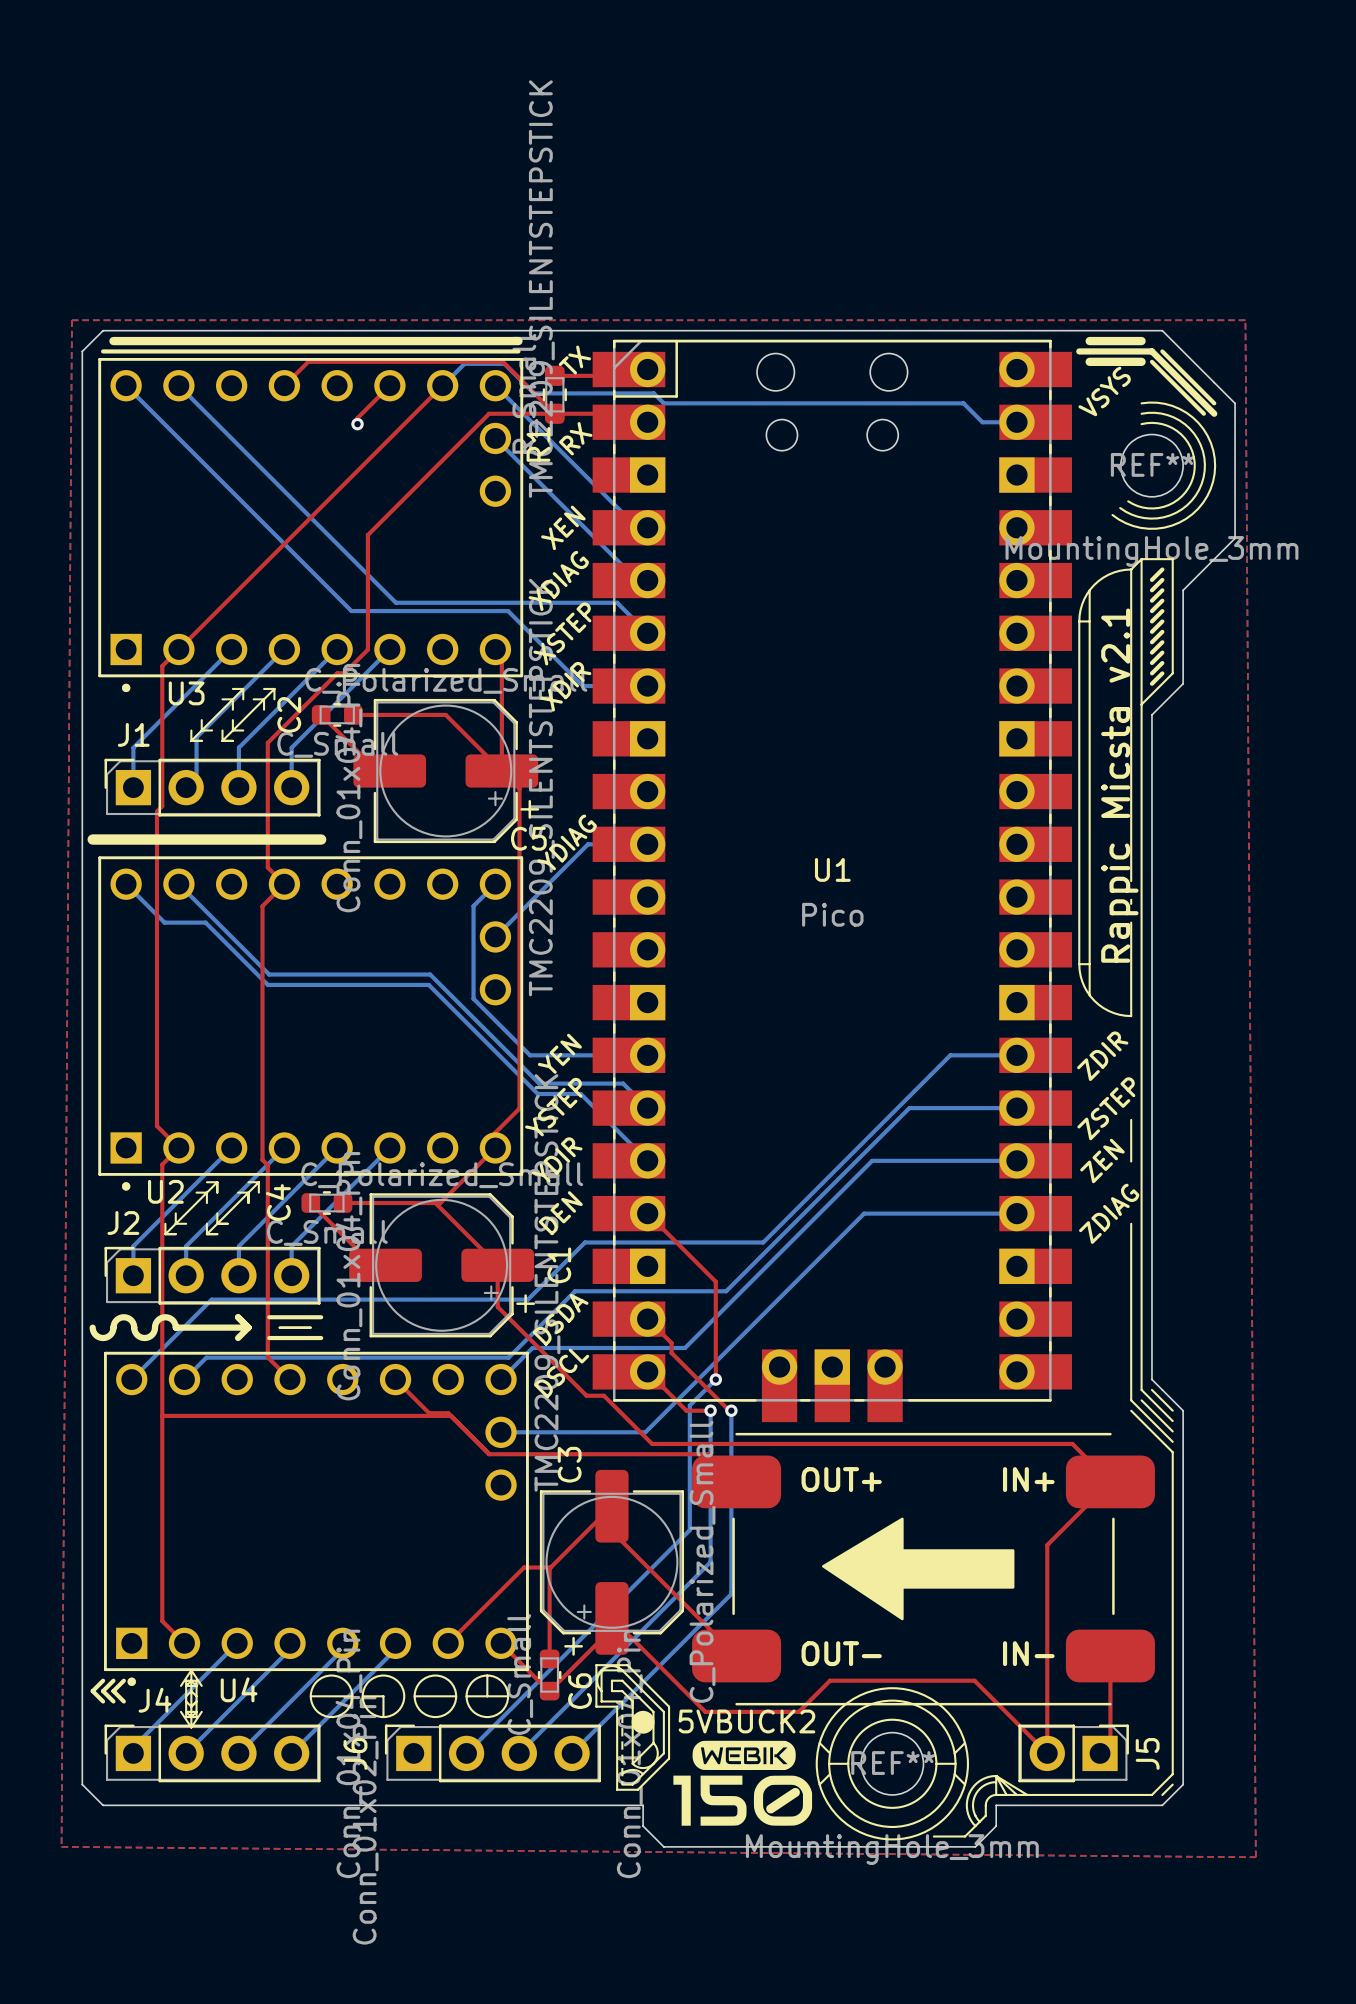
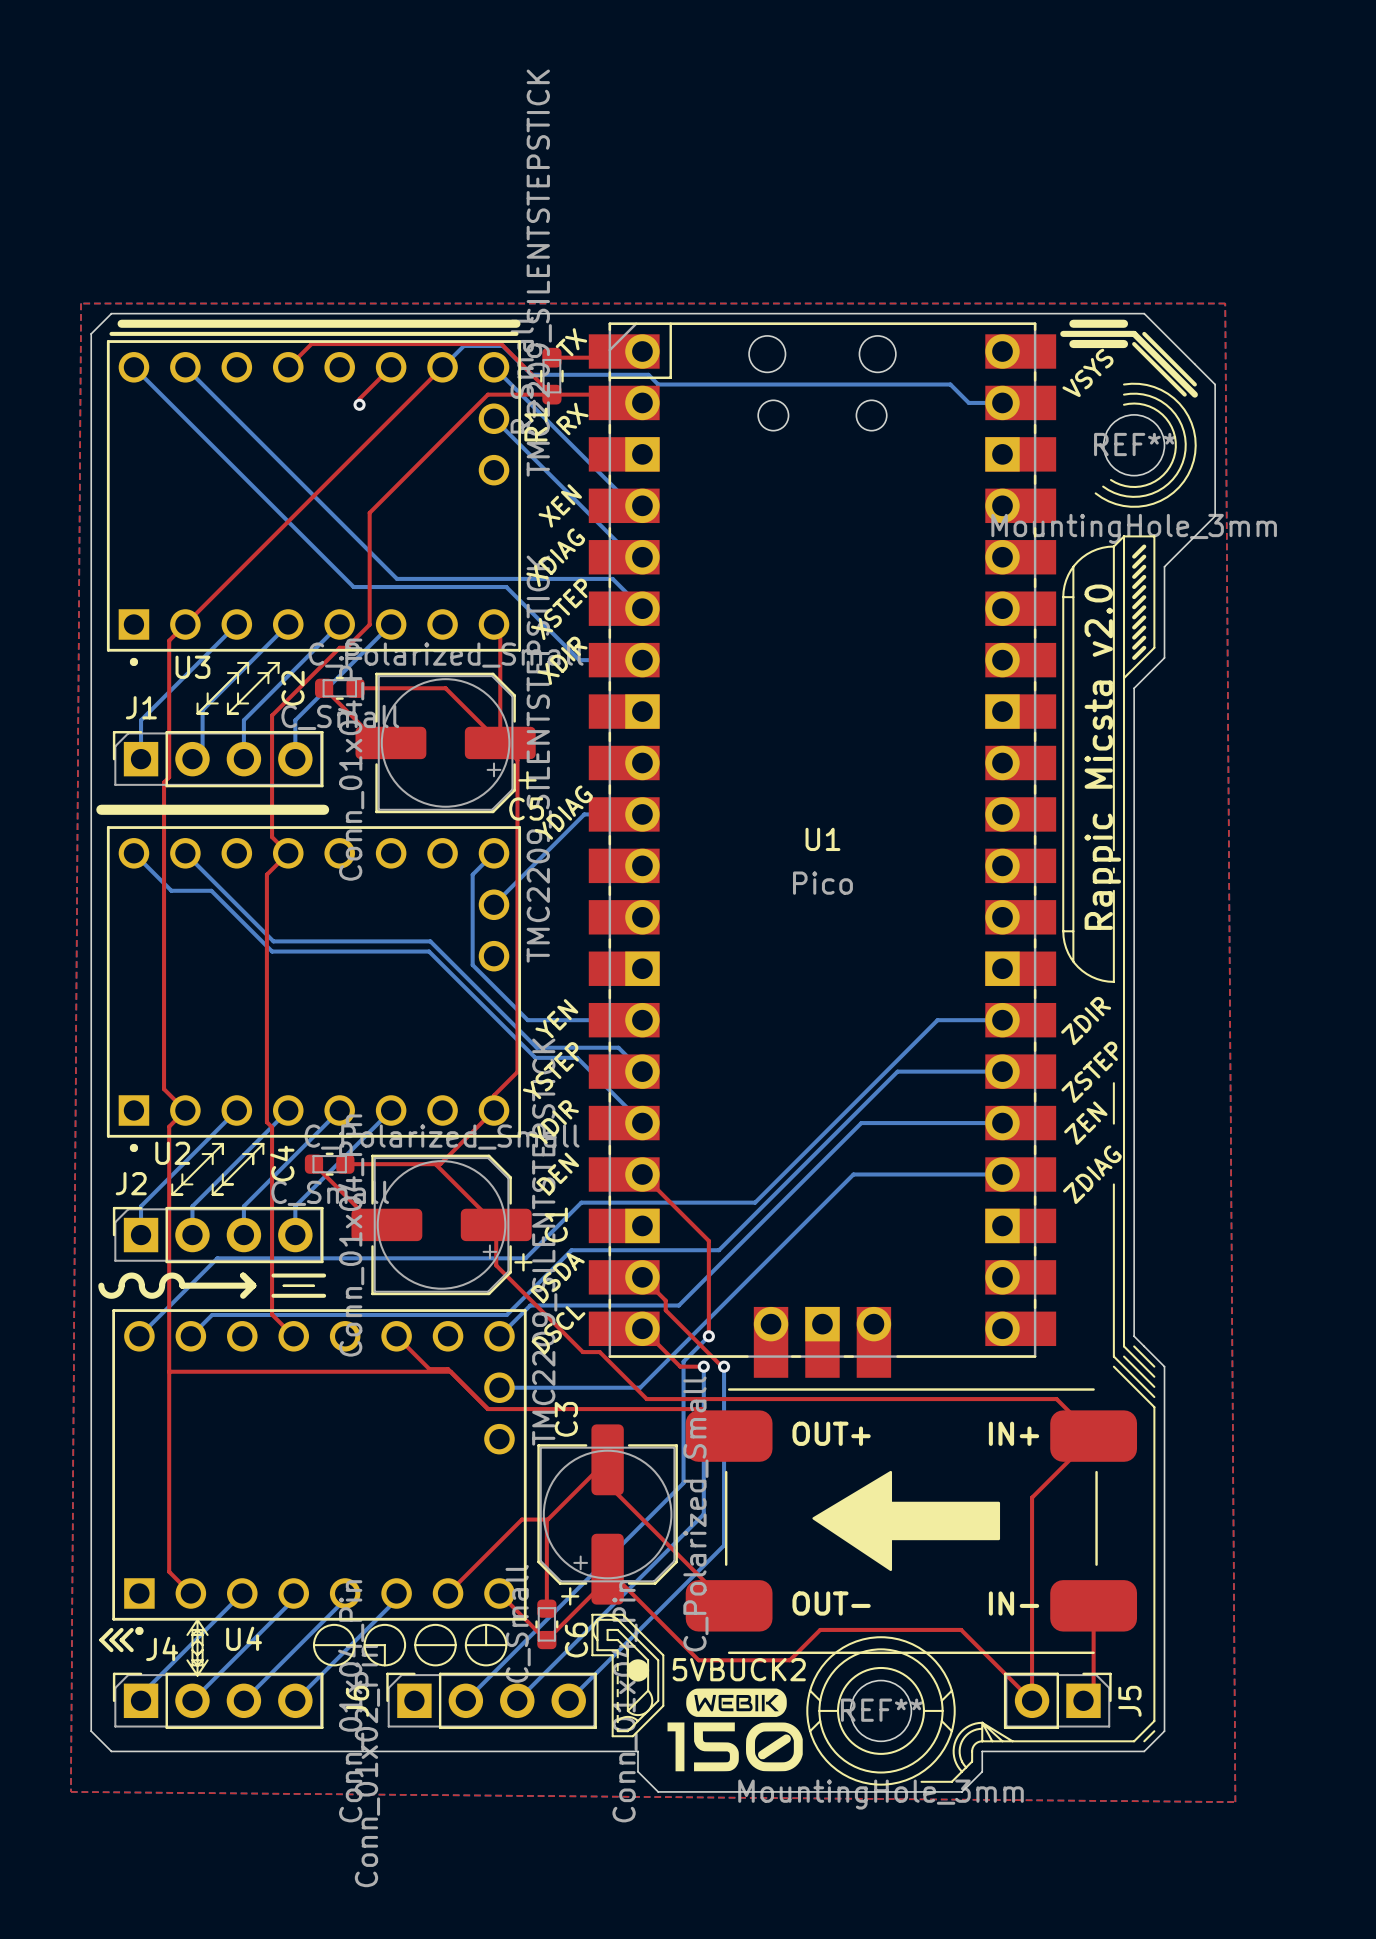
text: Rappic Micsta v2.1 (1119, 785) -> Rappic Micsta v2.0 (1102, 757)

